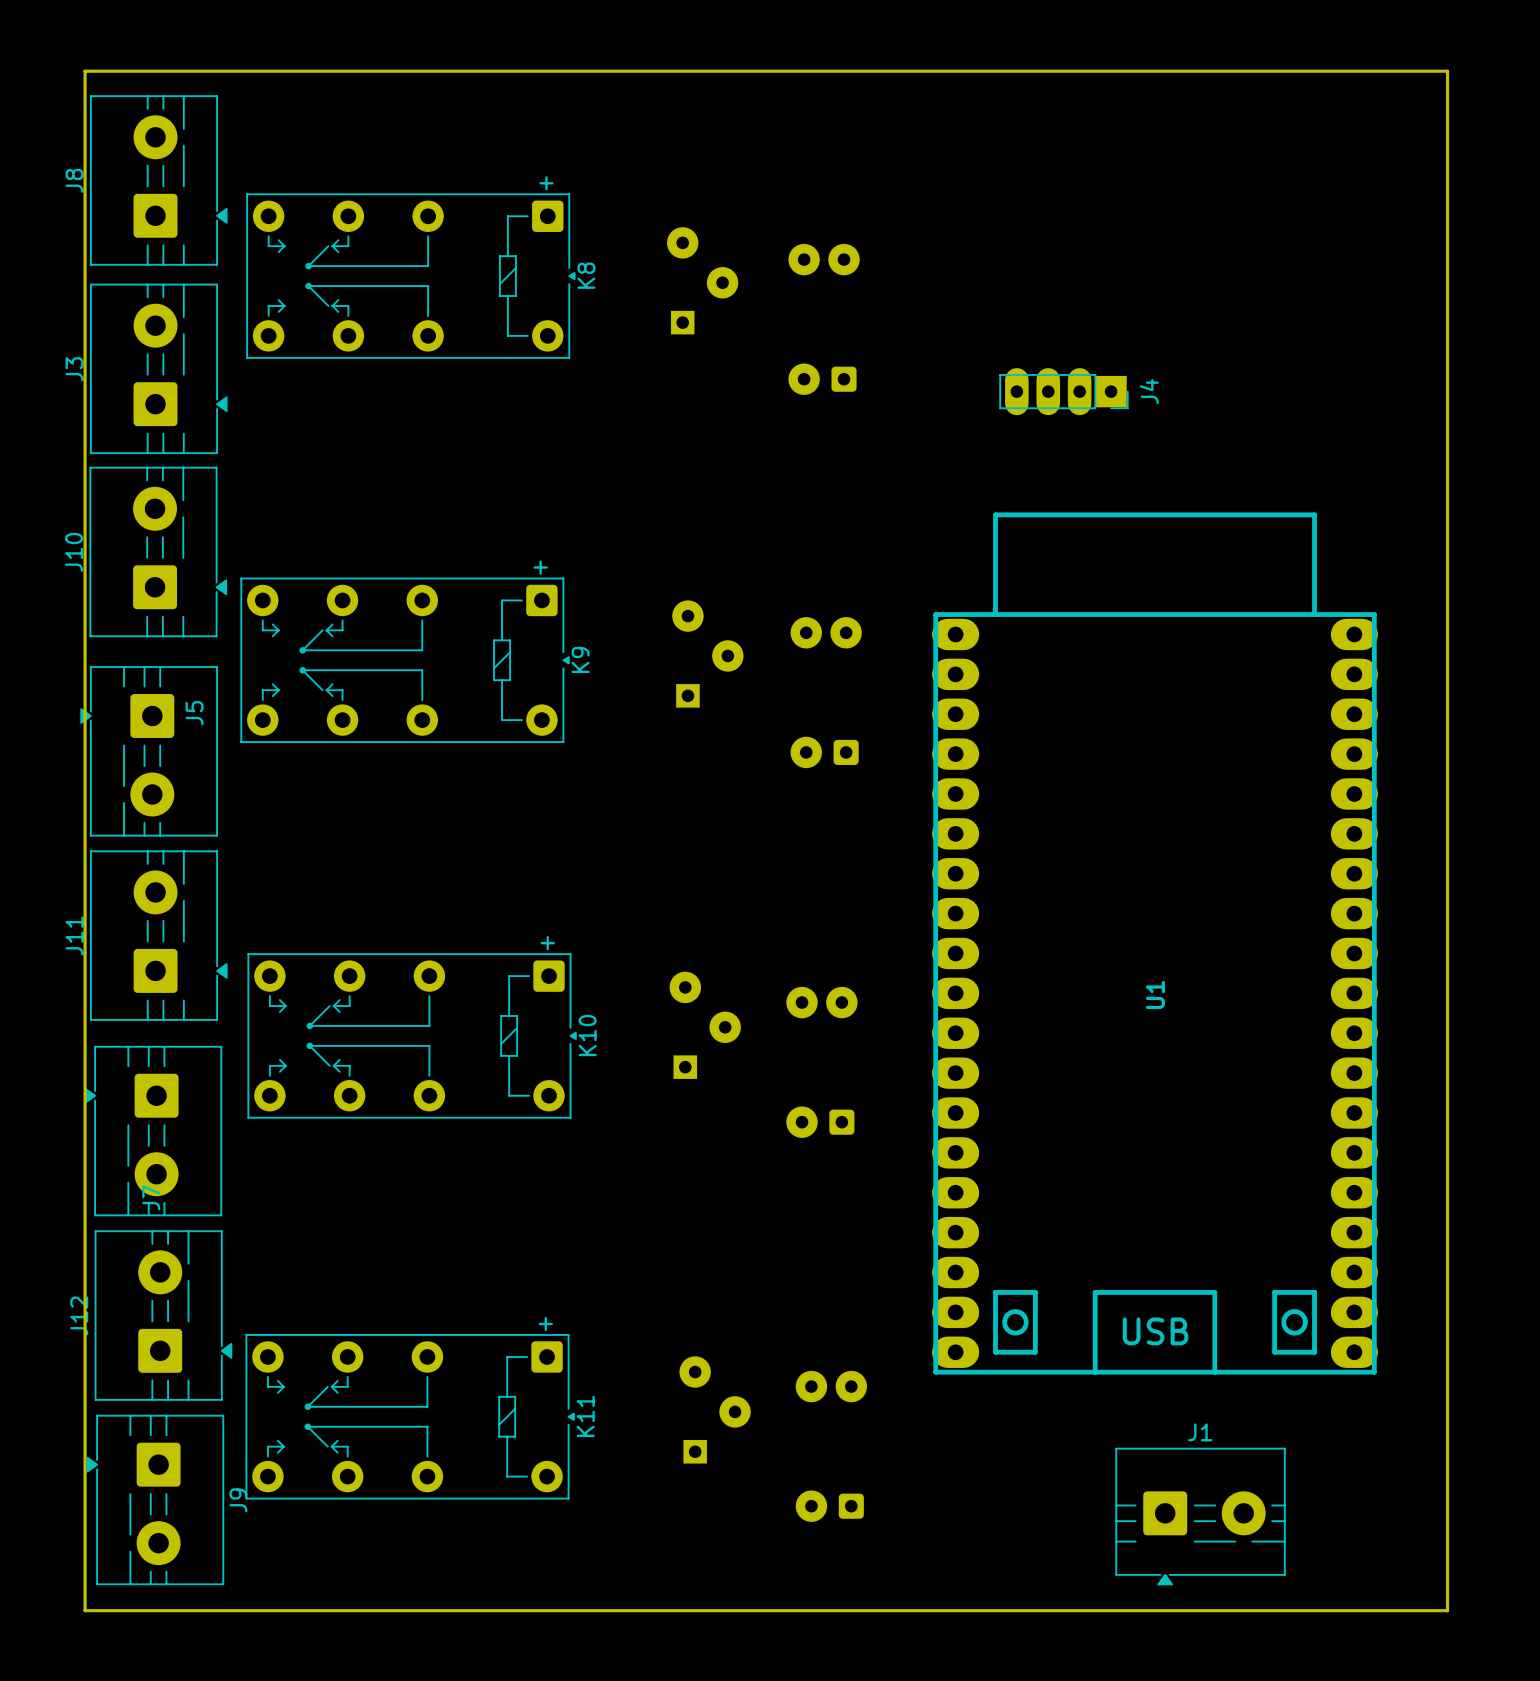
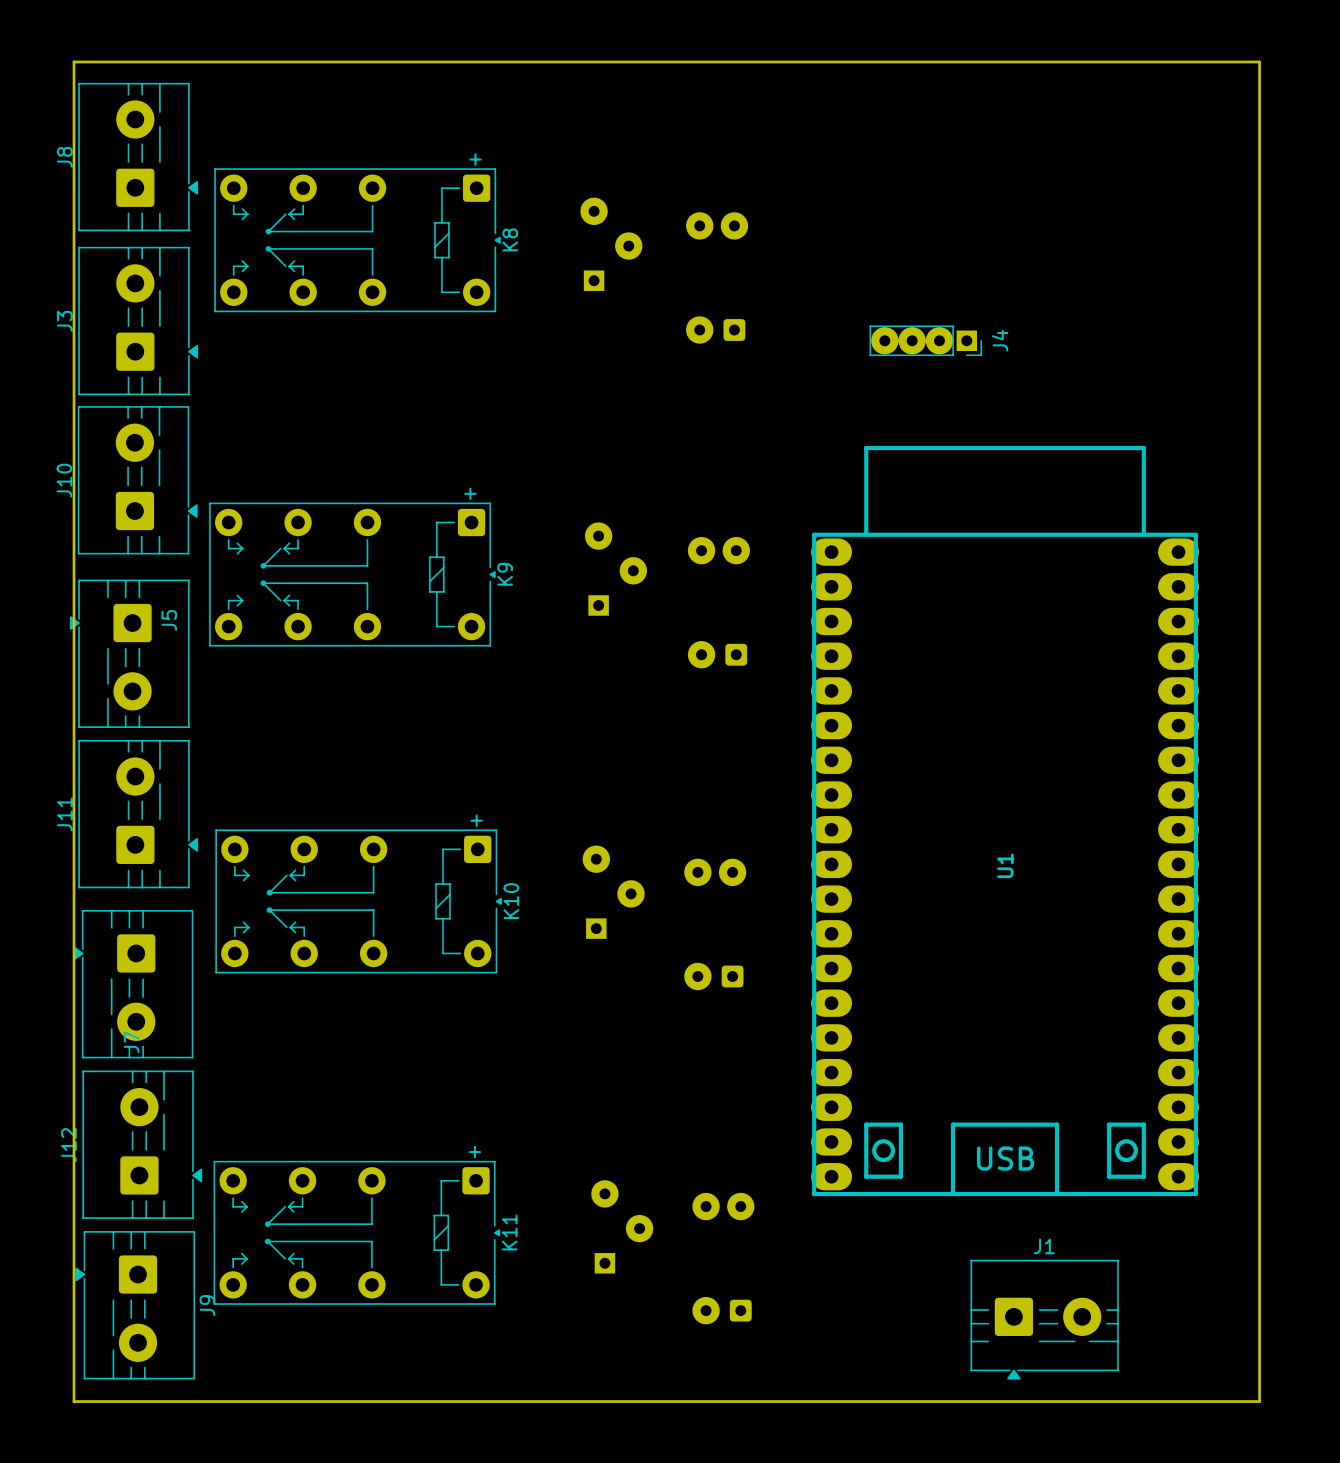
J4 footprint: [999, 368, 1129, 416] -> [869, 325, 983, 357]

